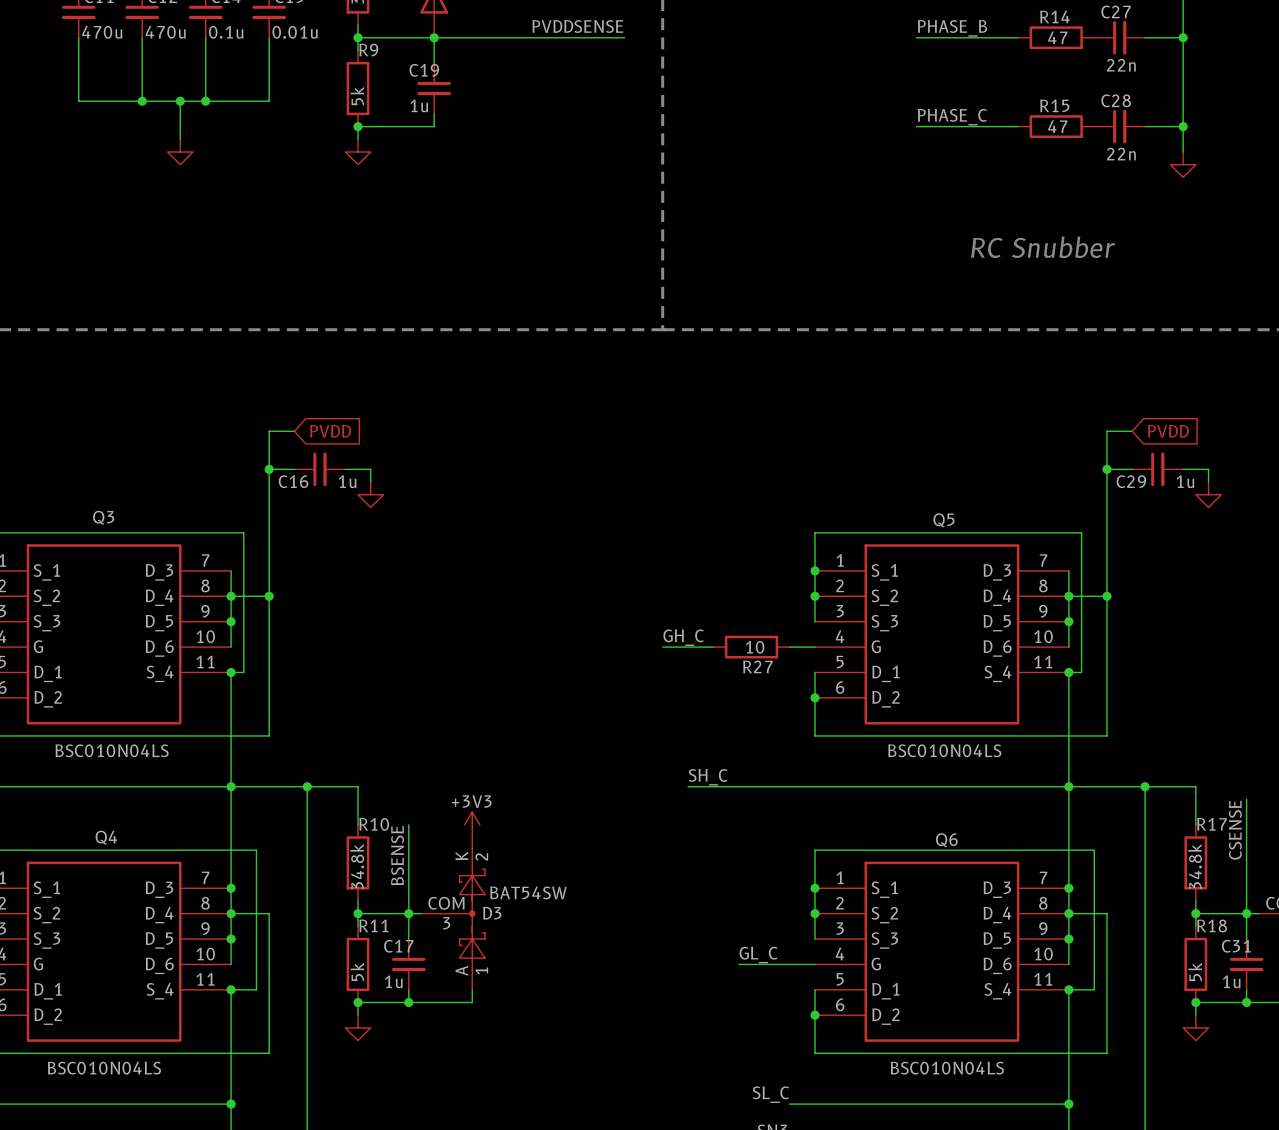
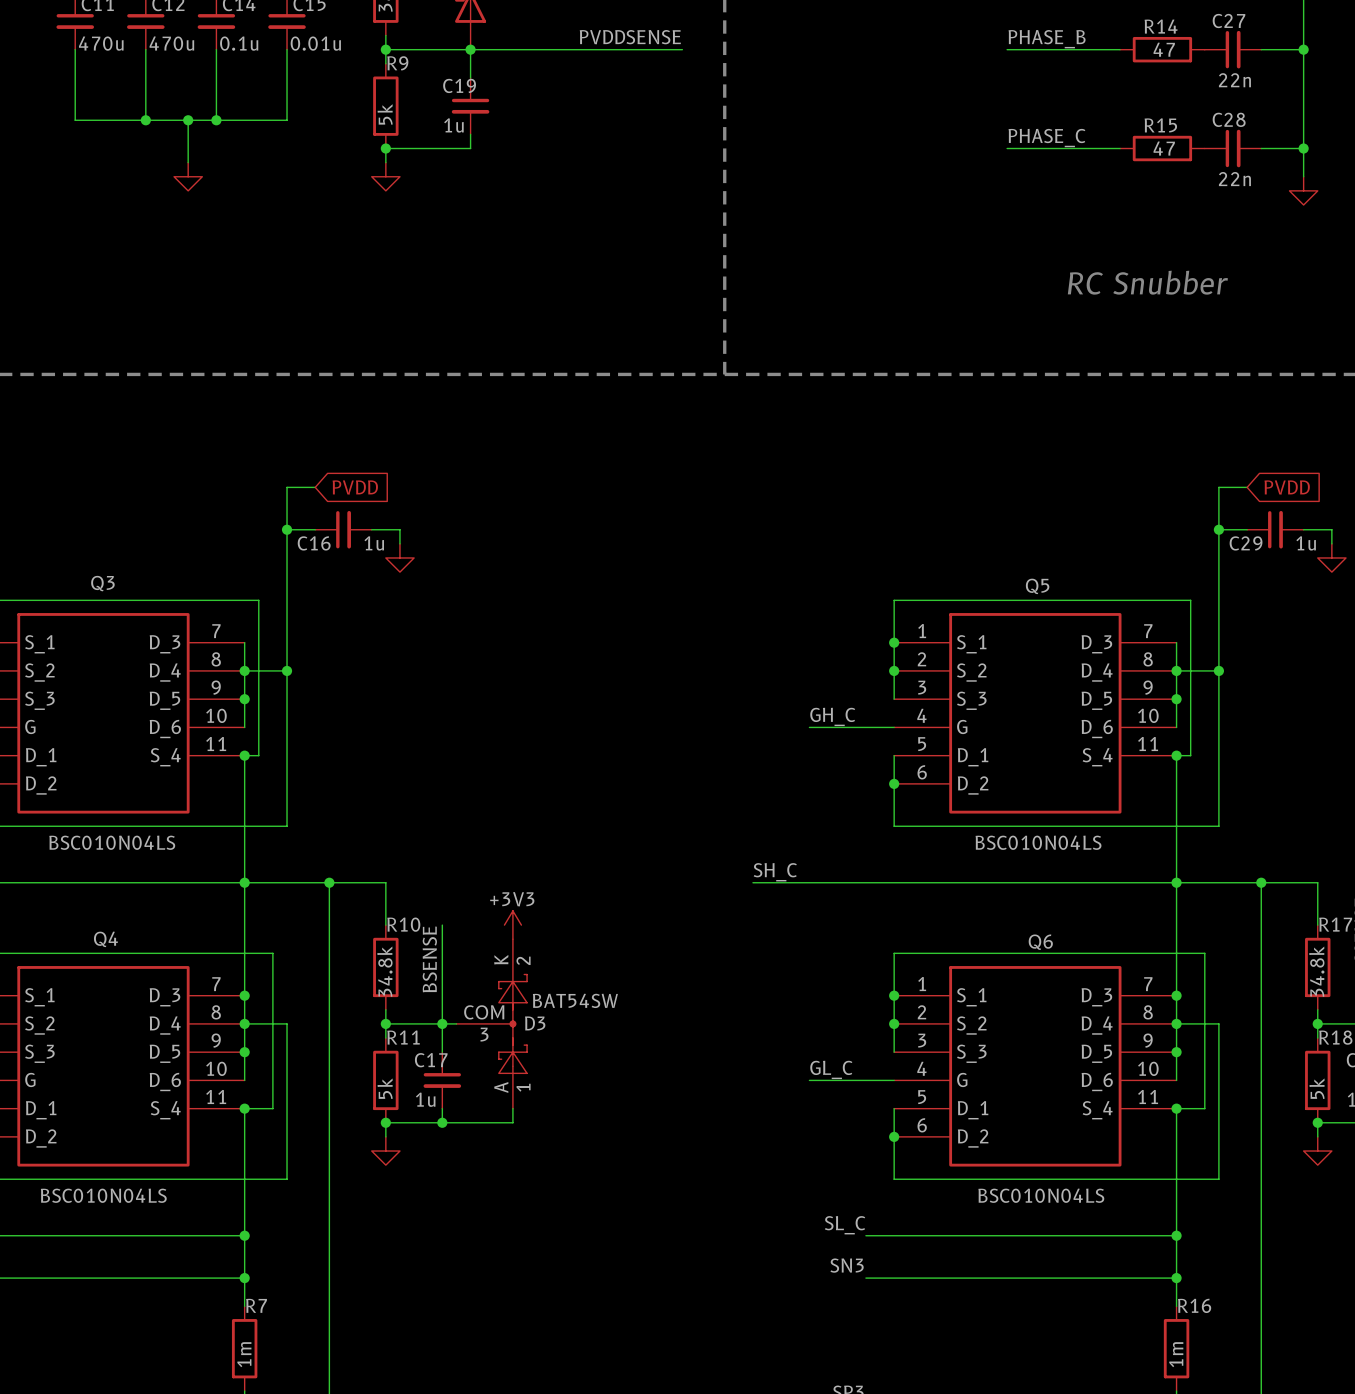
label position: GH_C (683, 637) -> GH_C (832, 716)
wire: (662, 647) (713, 647) -> (809, 727) (865, 727)
R27: 10 (751, 647) -> none

